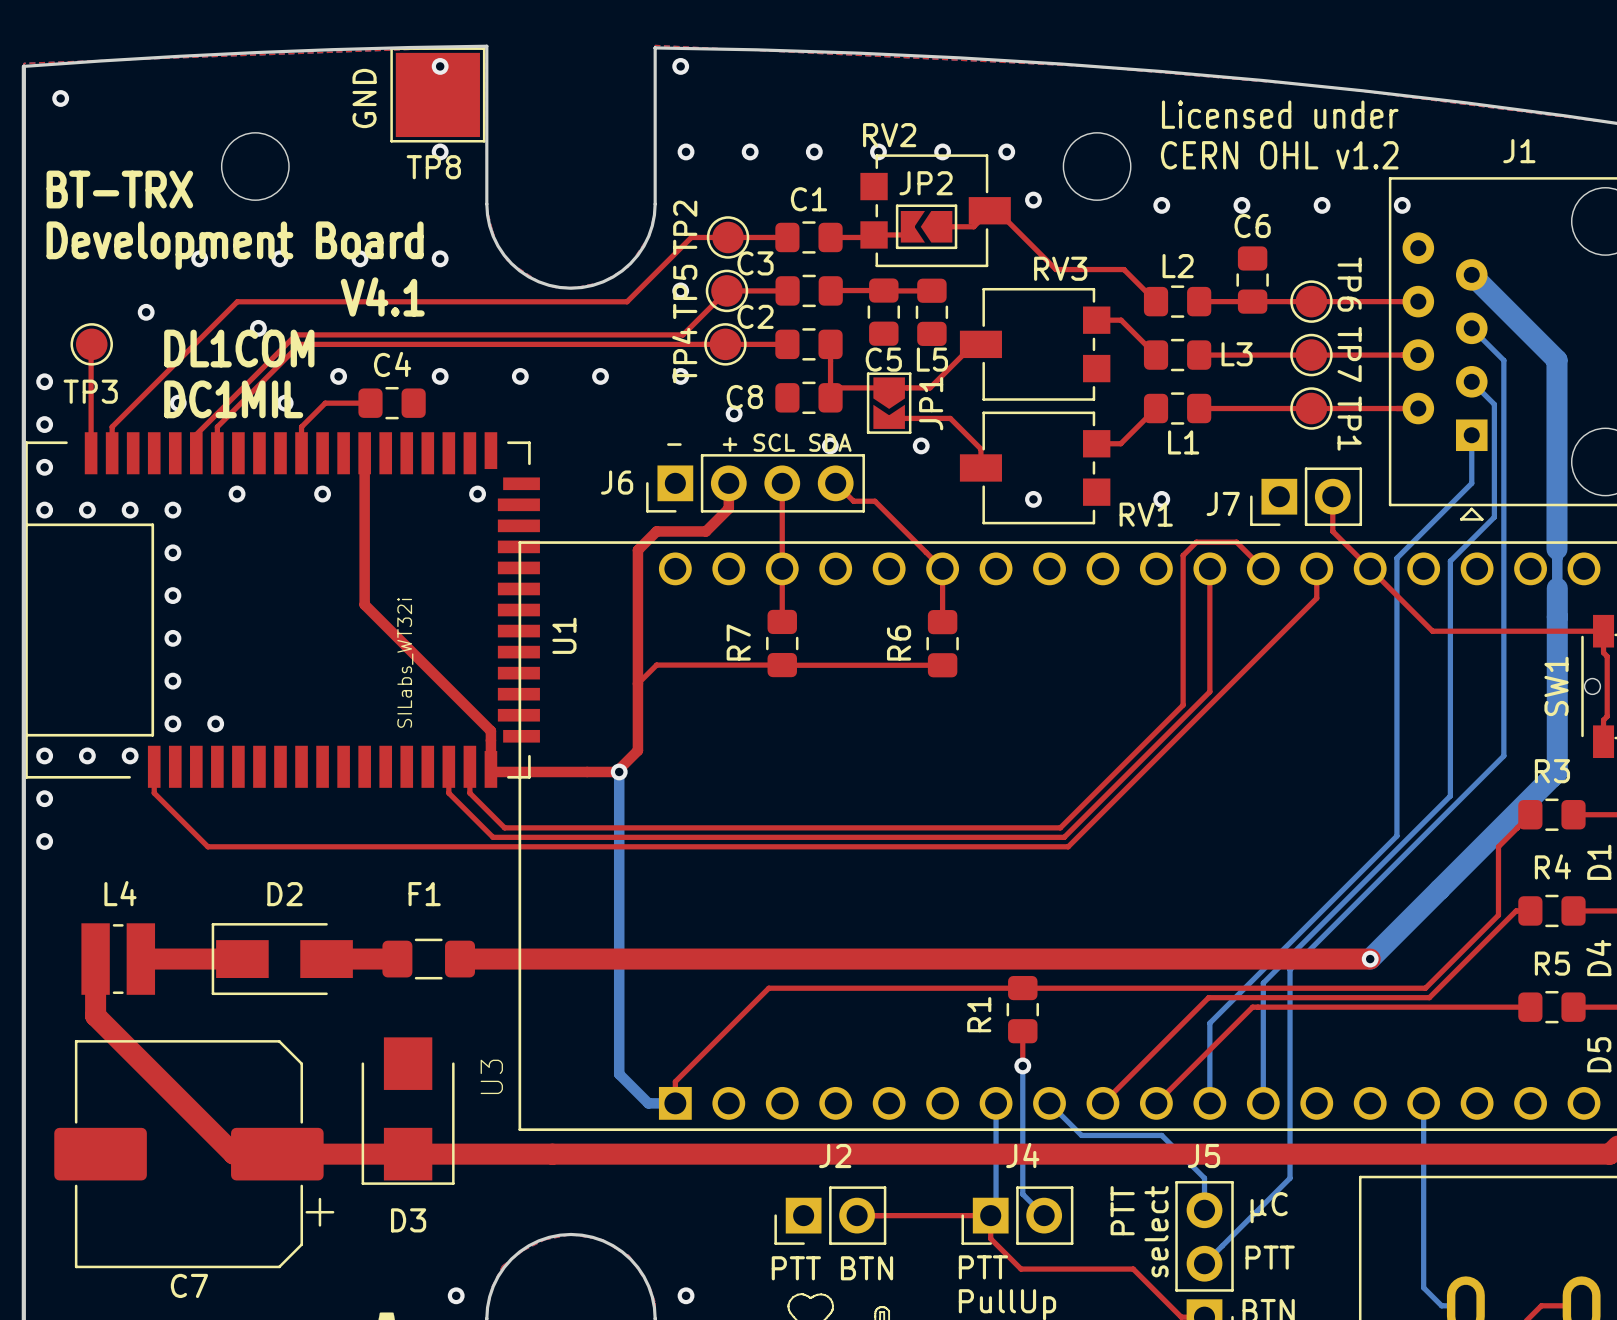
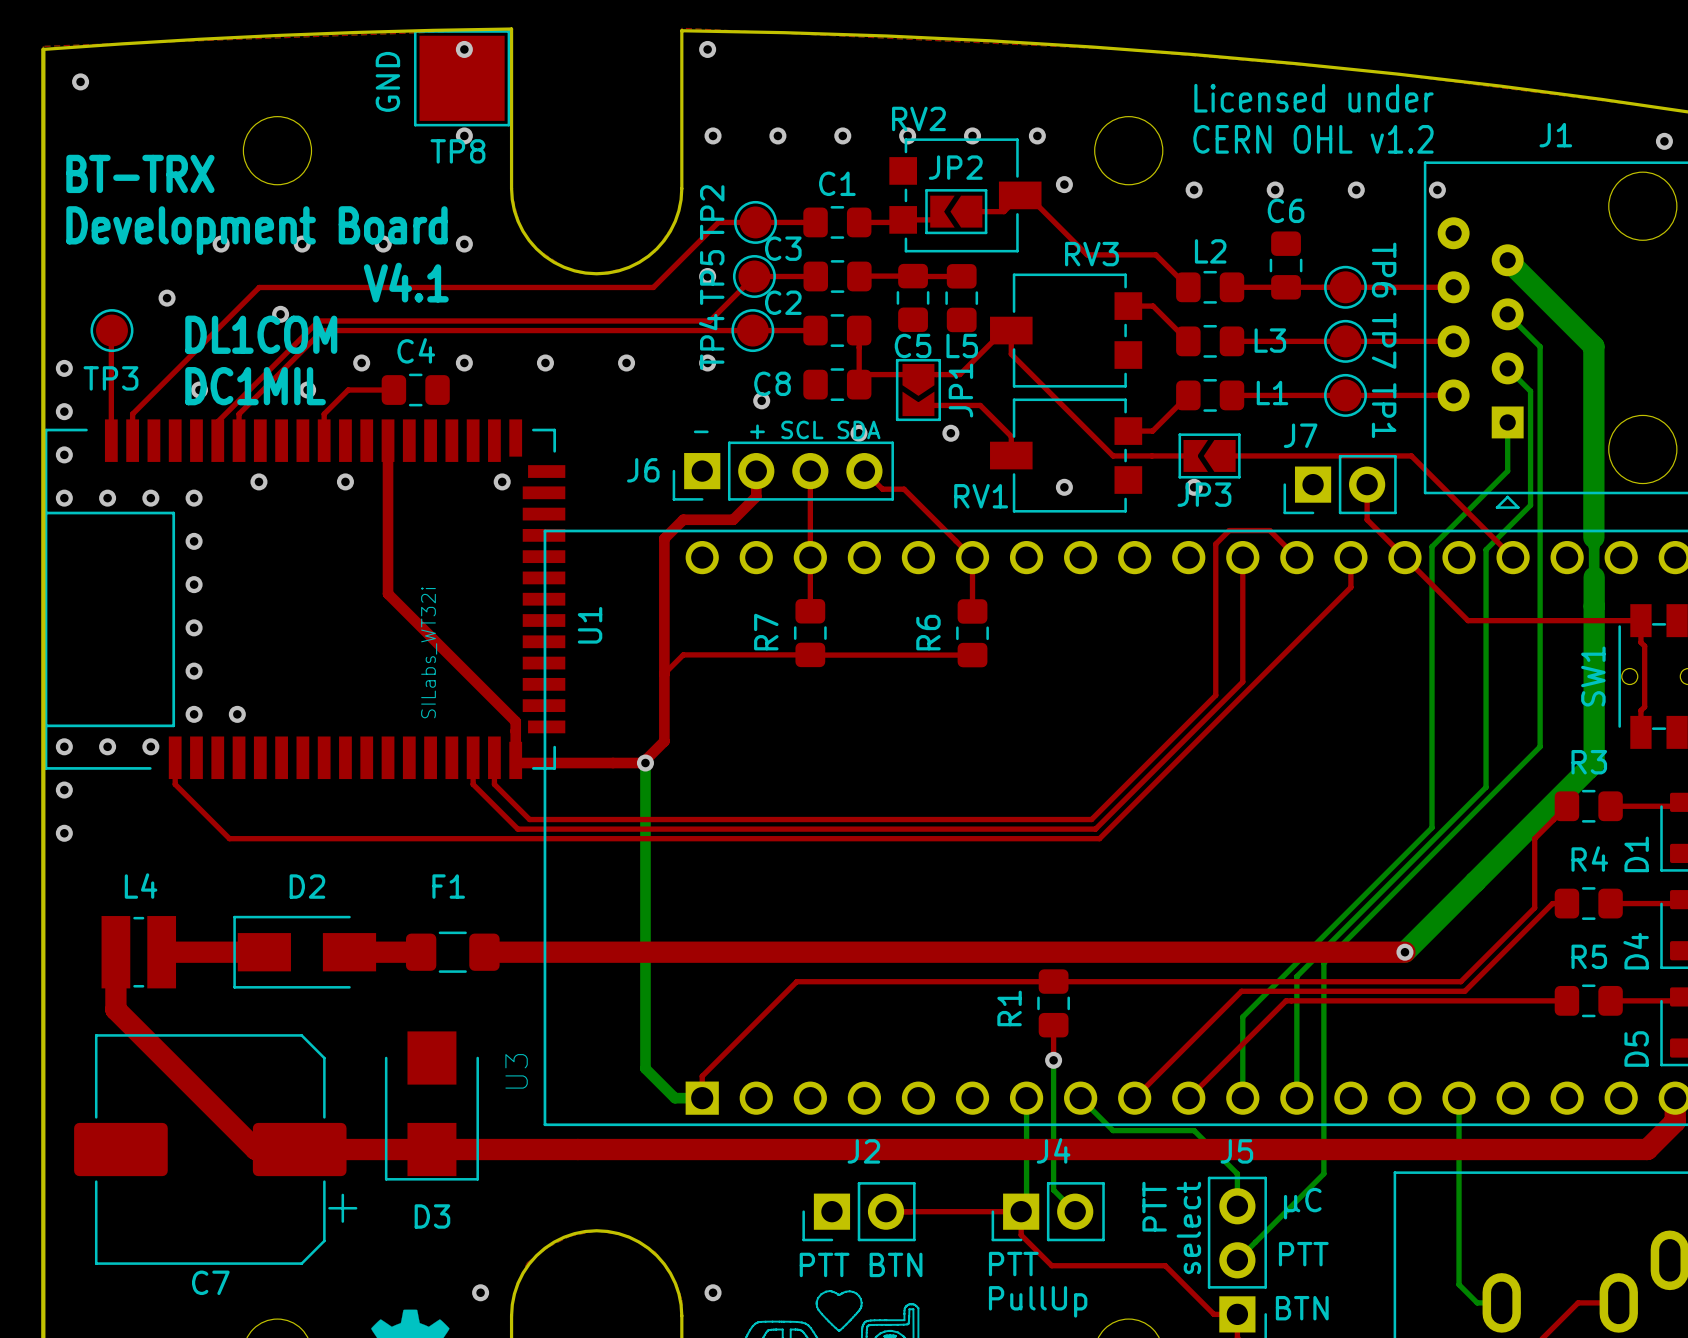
top track: none -> (1011, 330) (1011, 354) (1113, 455) (1194, 455)
L1 name position: L1 (1183, 442) -> L1 (1272, 393)
JP3: none -> (1209, 455)
top track: none -> (1225, 455) (1411, 455) (1513, 557)
J7 name position: J7 (1223, 503) -> J7 (1300, 435)
RV1 name position: RV1 (1146, 514) -> RV1 (981, 496)

